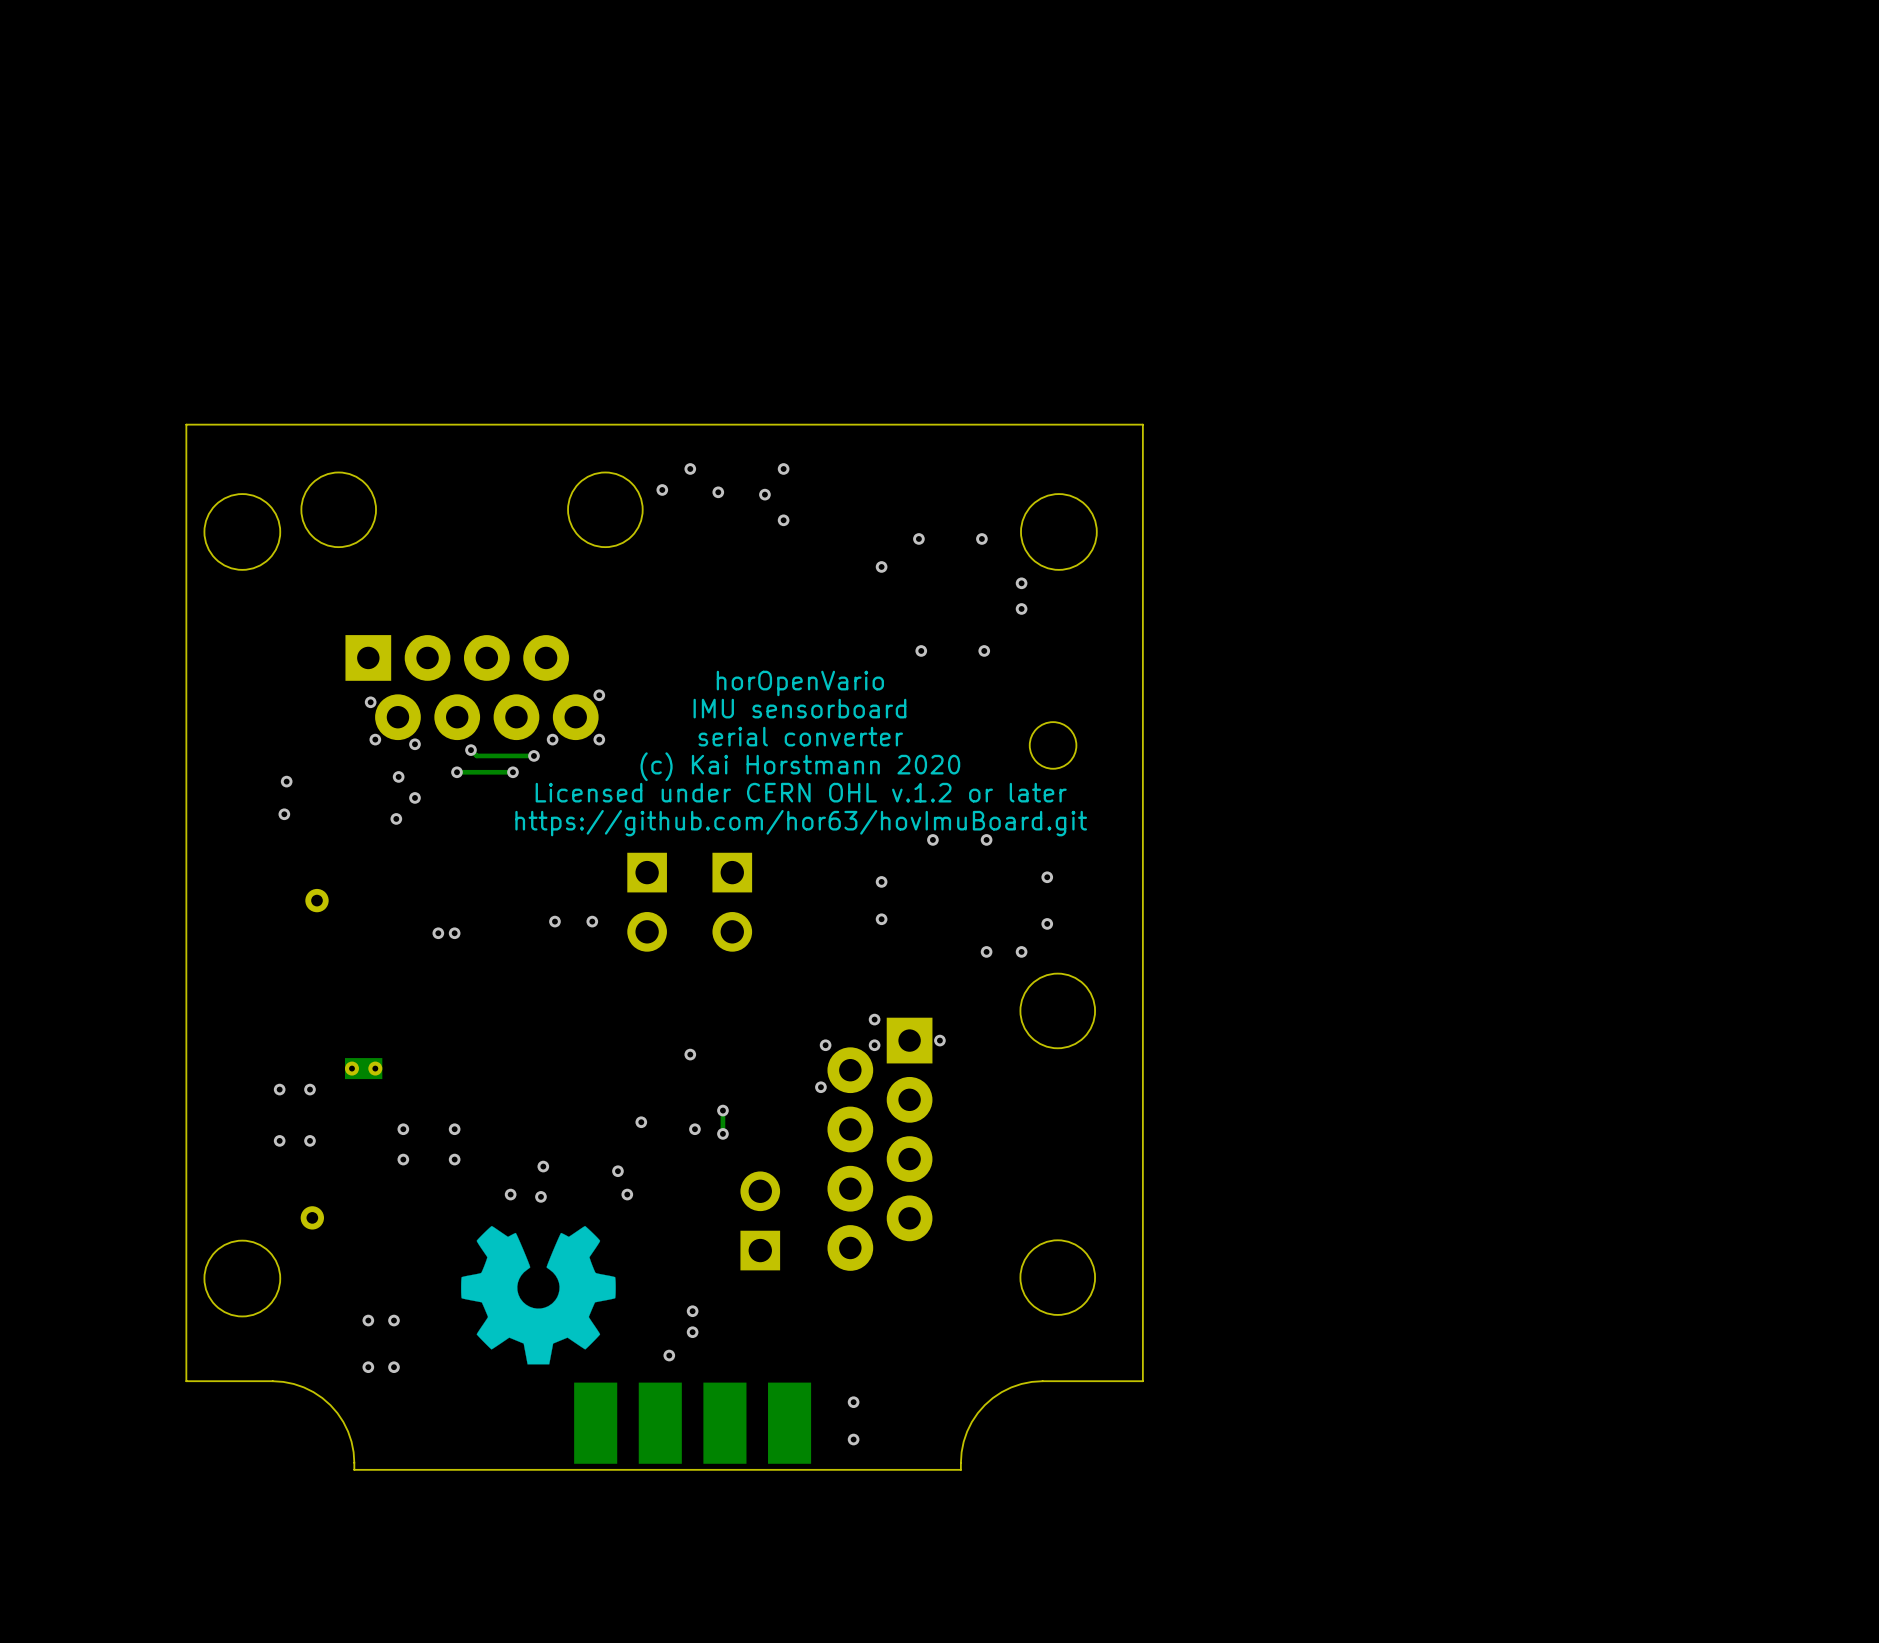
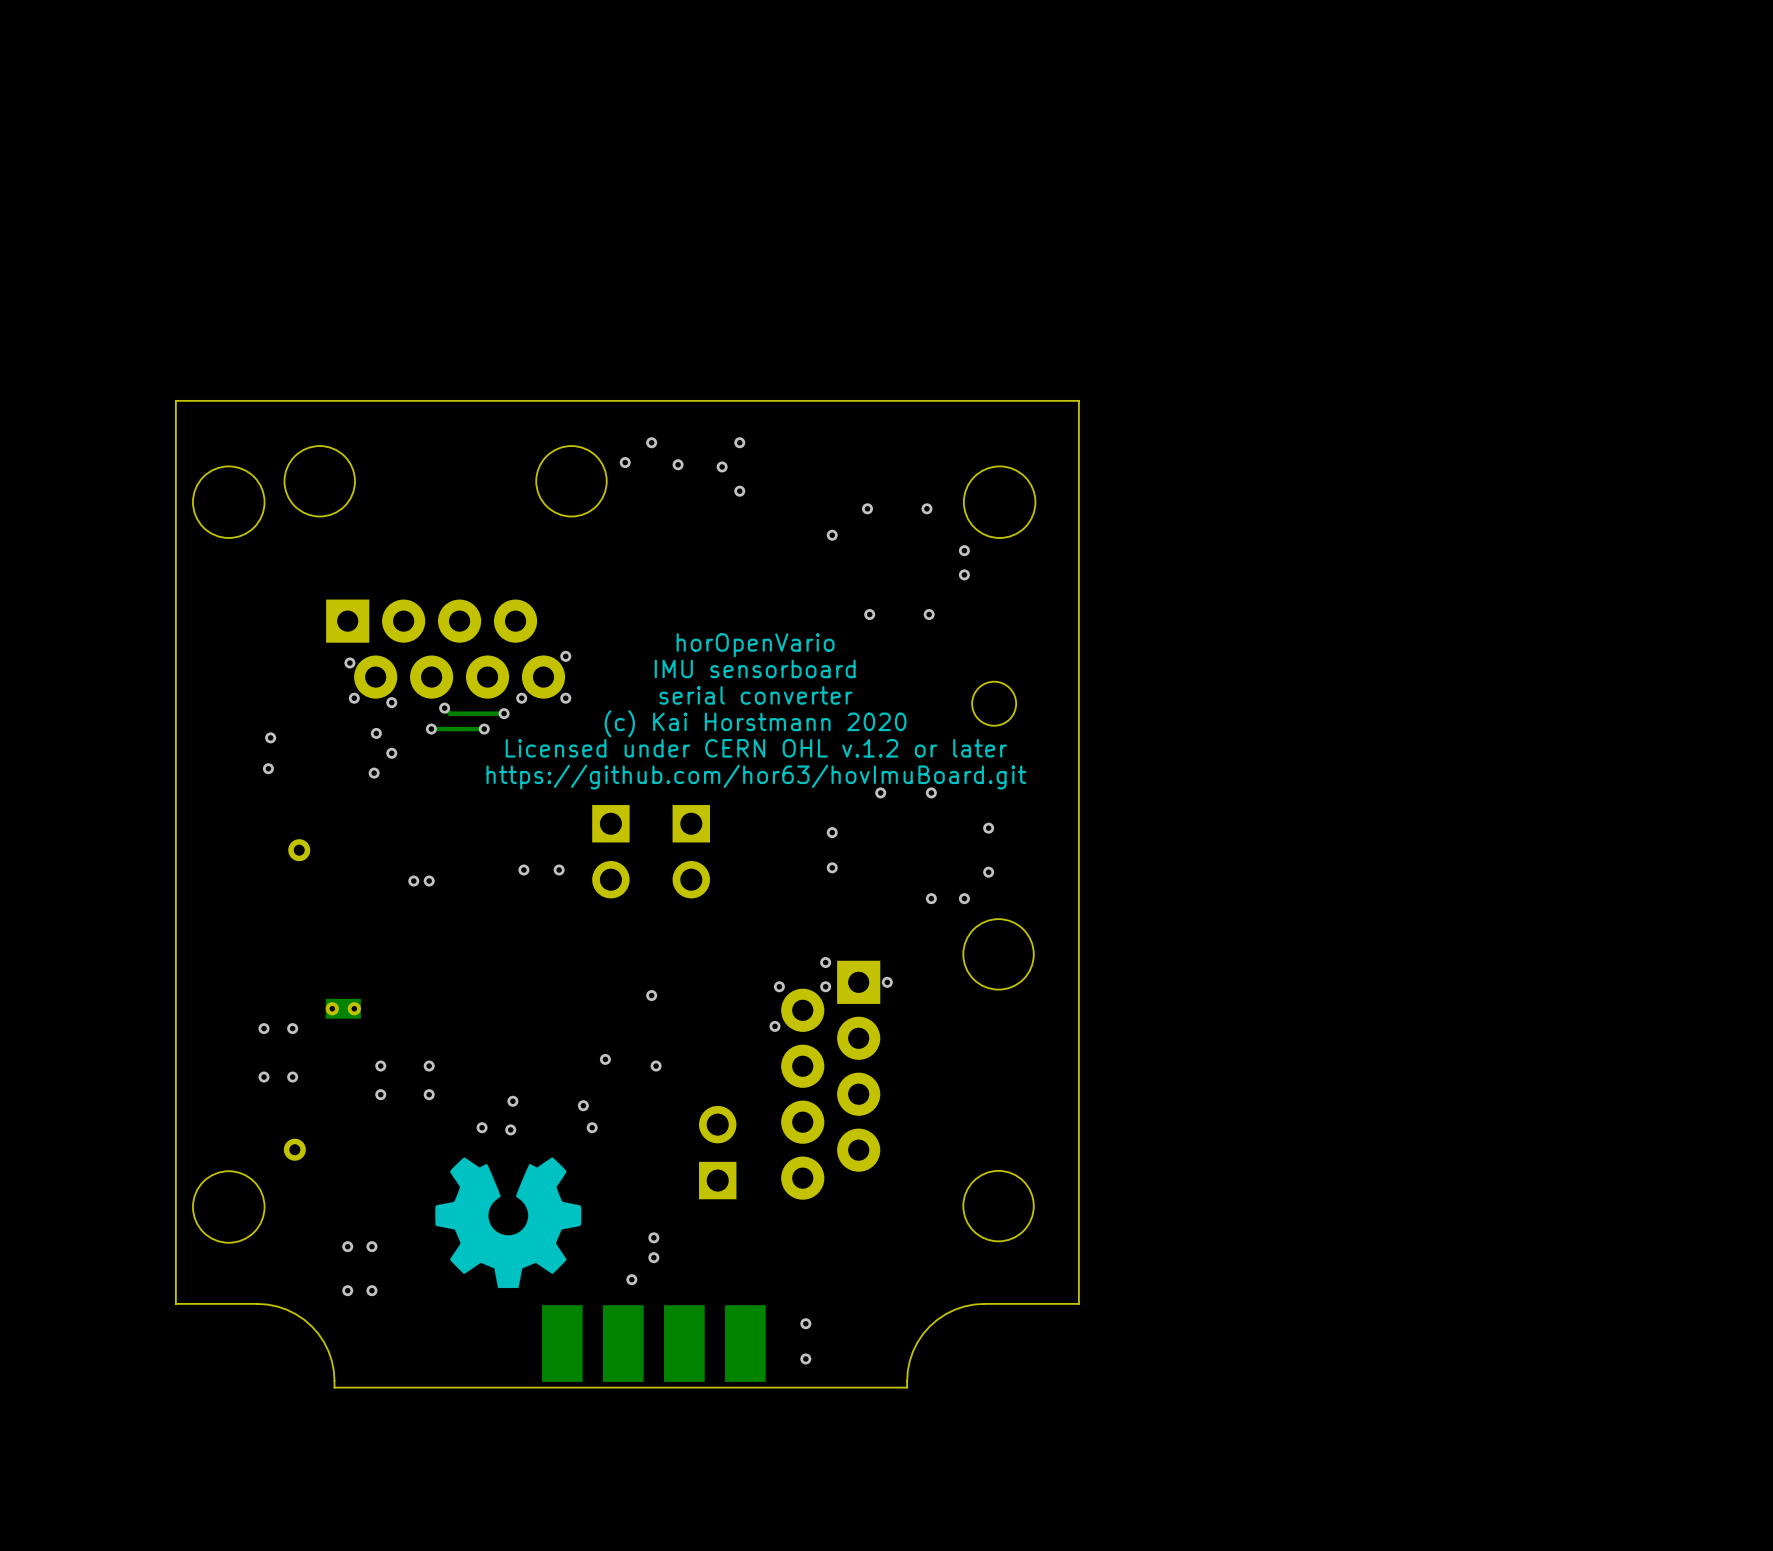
track: (722, 1110) (722, 1133) -> none
via: (722, 1110) -> none
via: (722, 1133) -> none

